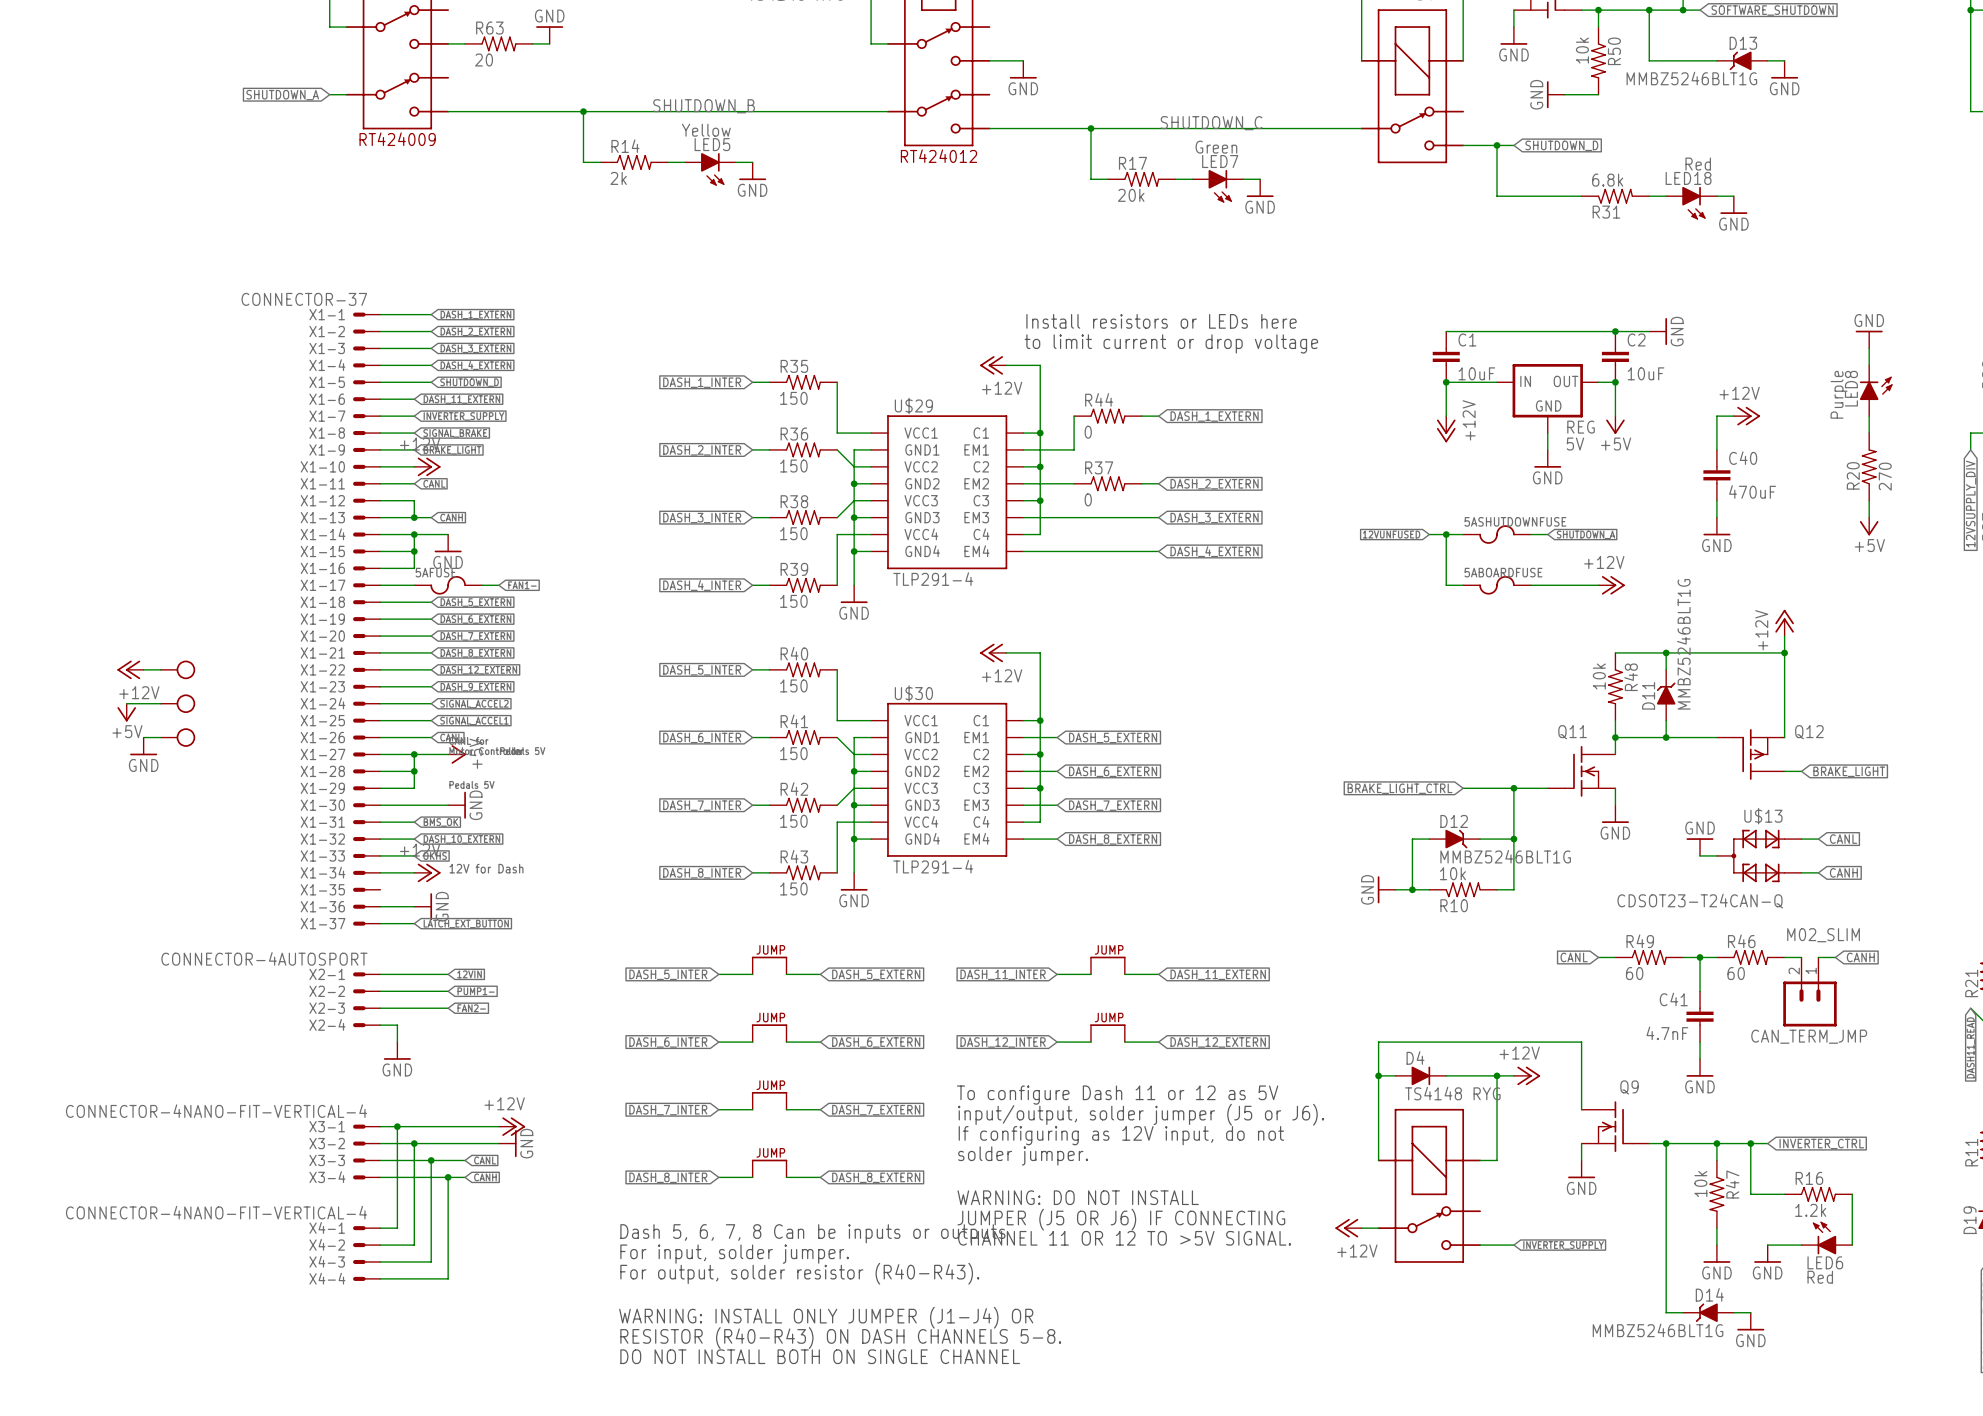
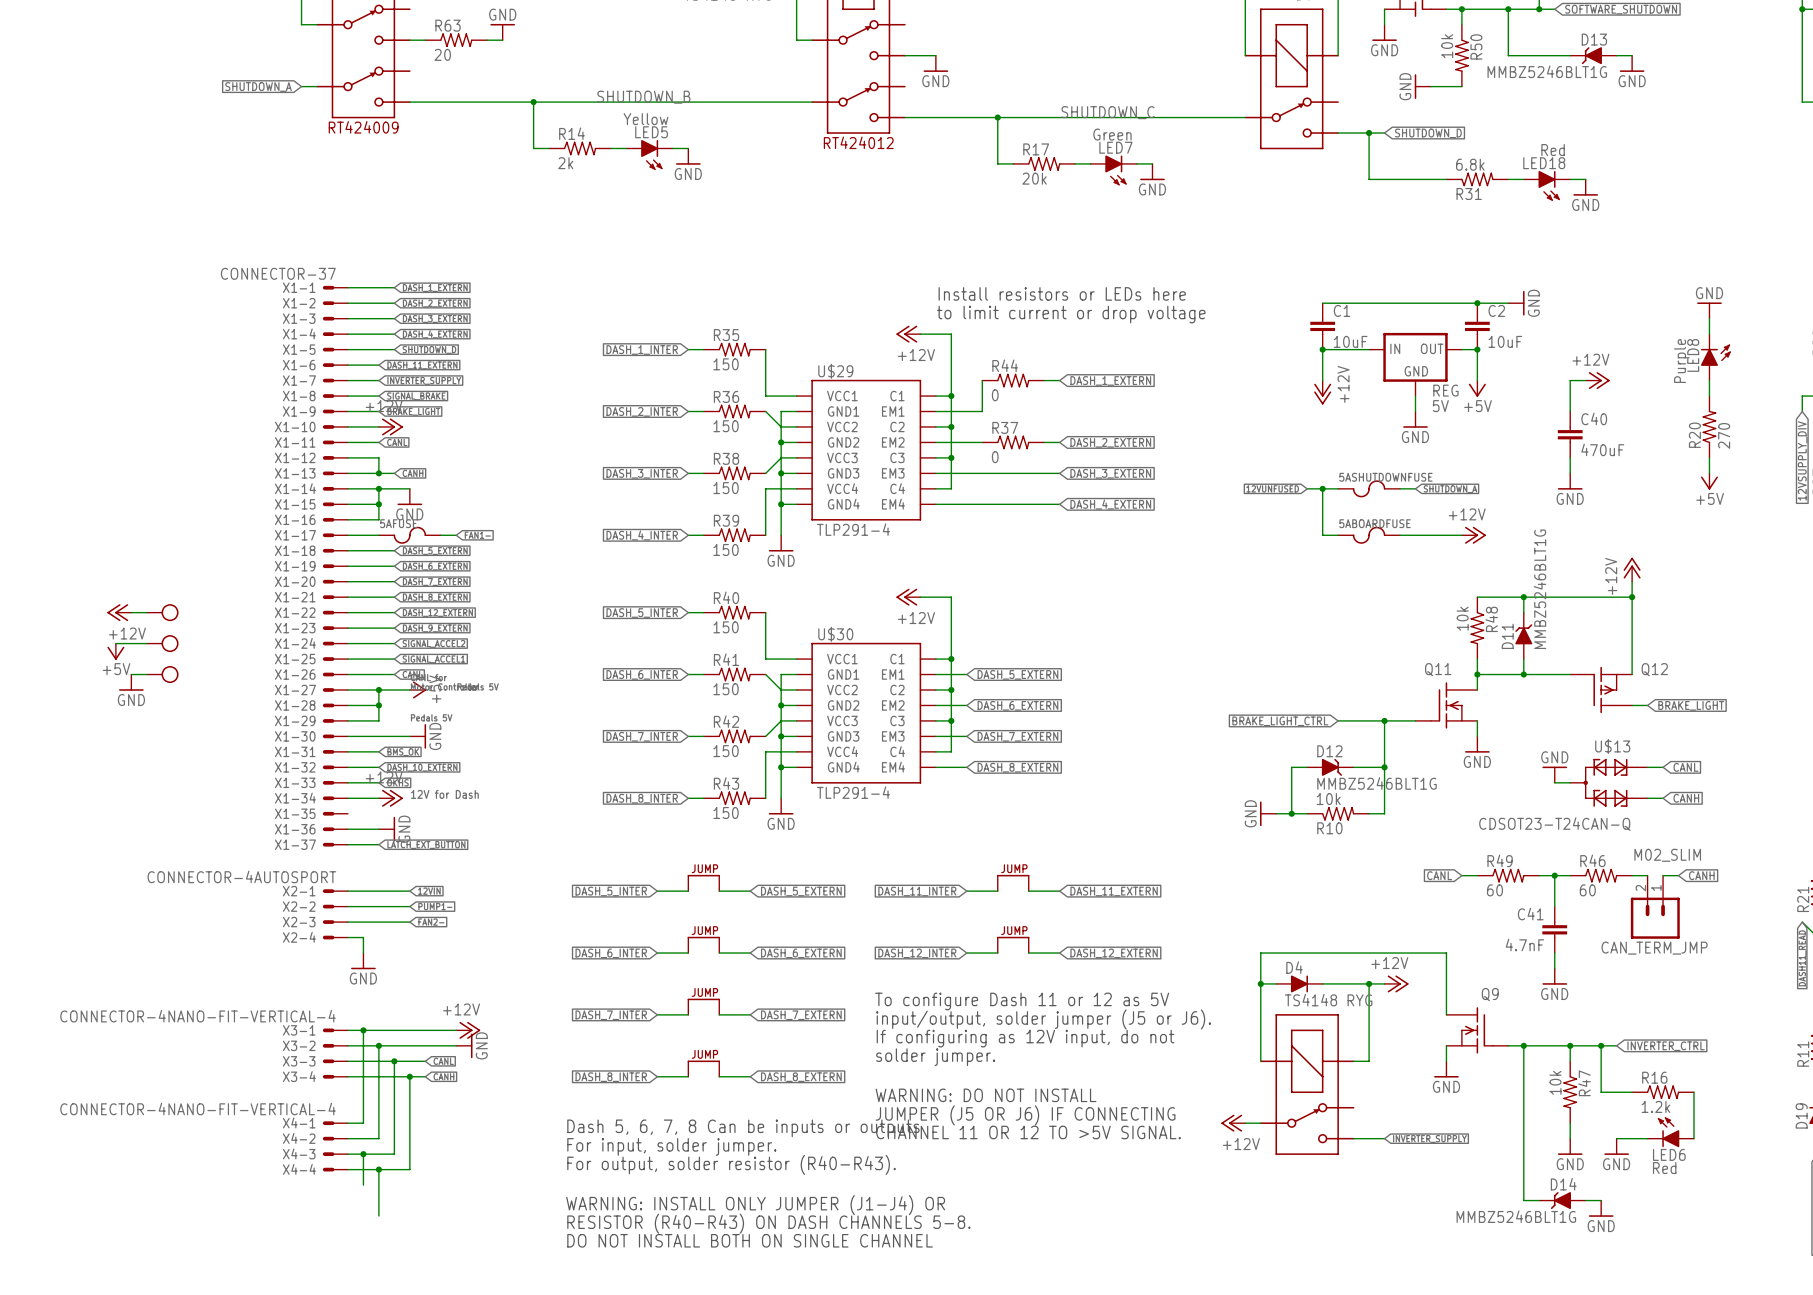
wire: none -> (363, 1154) (363, 1185)
junction: none -> (363, 1154)
wire: none -> (378, 1169) (378, 1216)
junction: none -> (378, 1169)

